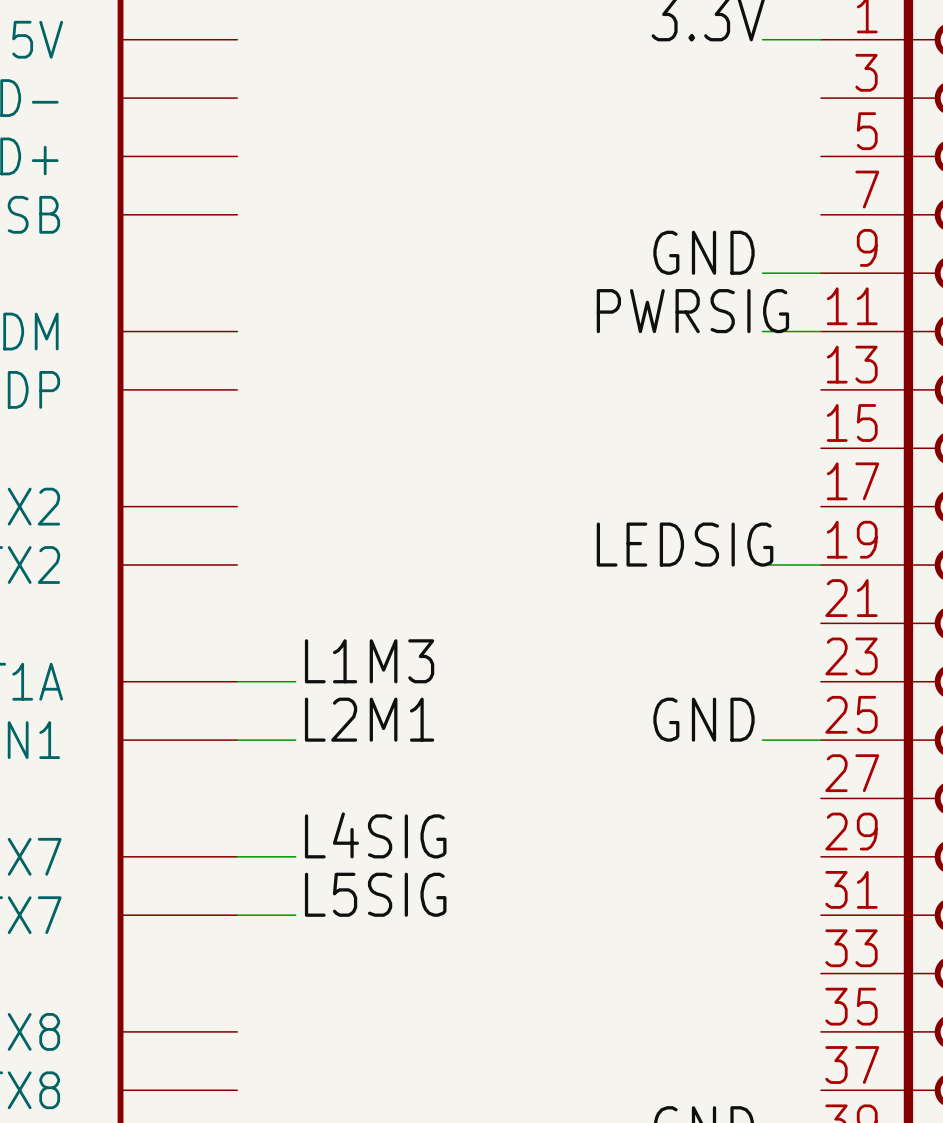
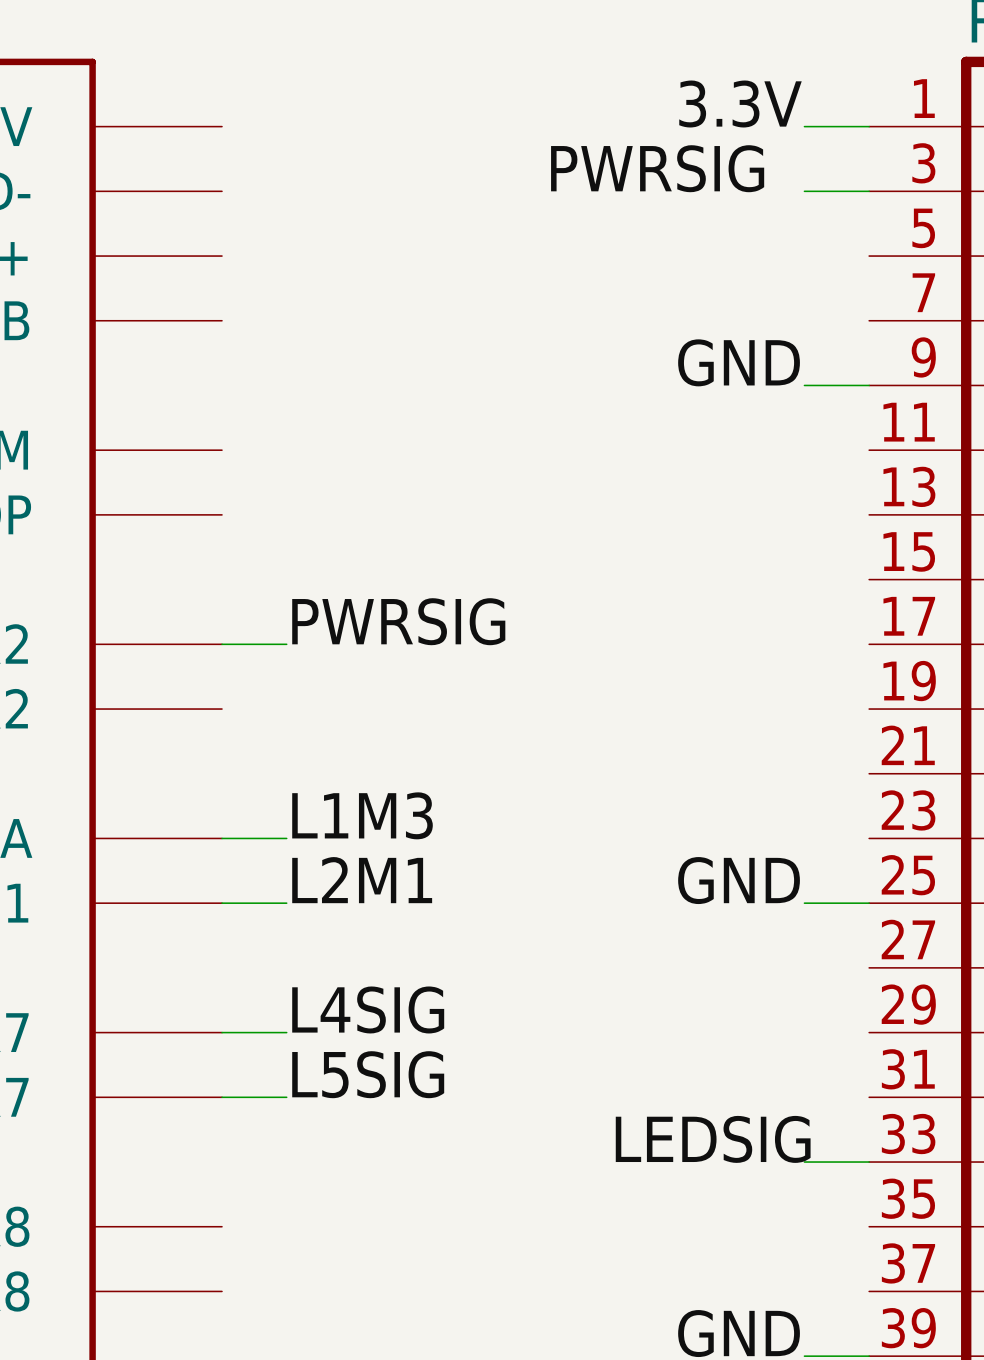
label: none -> PWRSIG (657, 168)
label: PWRSIG (692, 311) -> none
wire: (762, 331) (820, 331) -> (804, 191) (869, 191)
label: none -> PWRSIG (398, 621)
wire: none -> (222, 644) (286, 644)
label position: LEDSIG (685, 544) -> LEDSIG (713, 1139)
wire: (762, 565) (820, 565) -> (804, 1162) (869, 1162)

